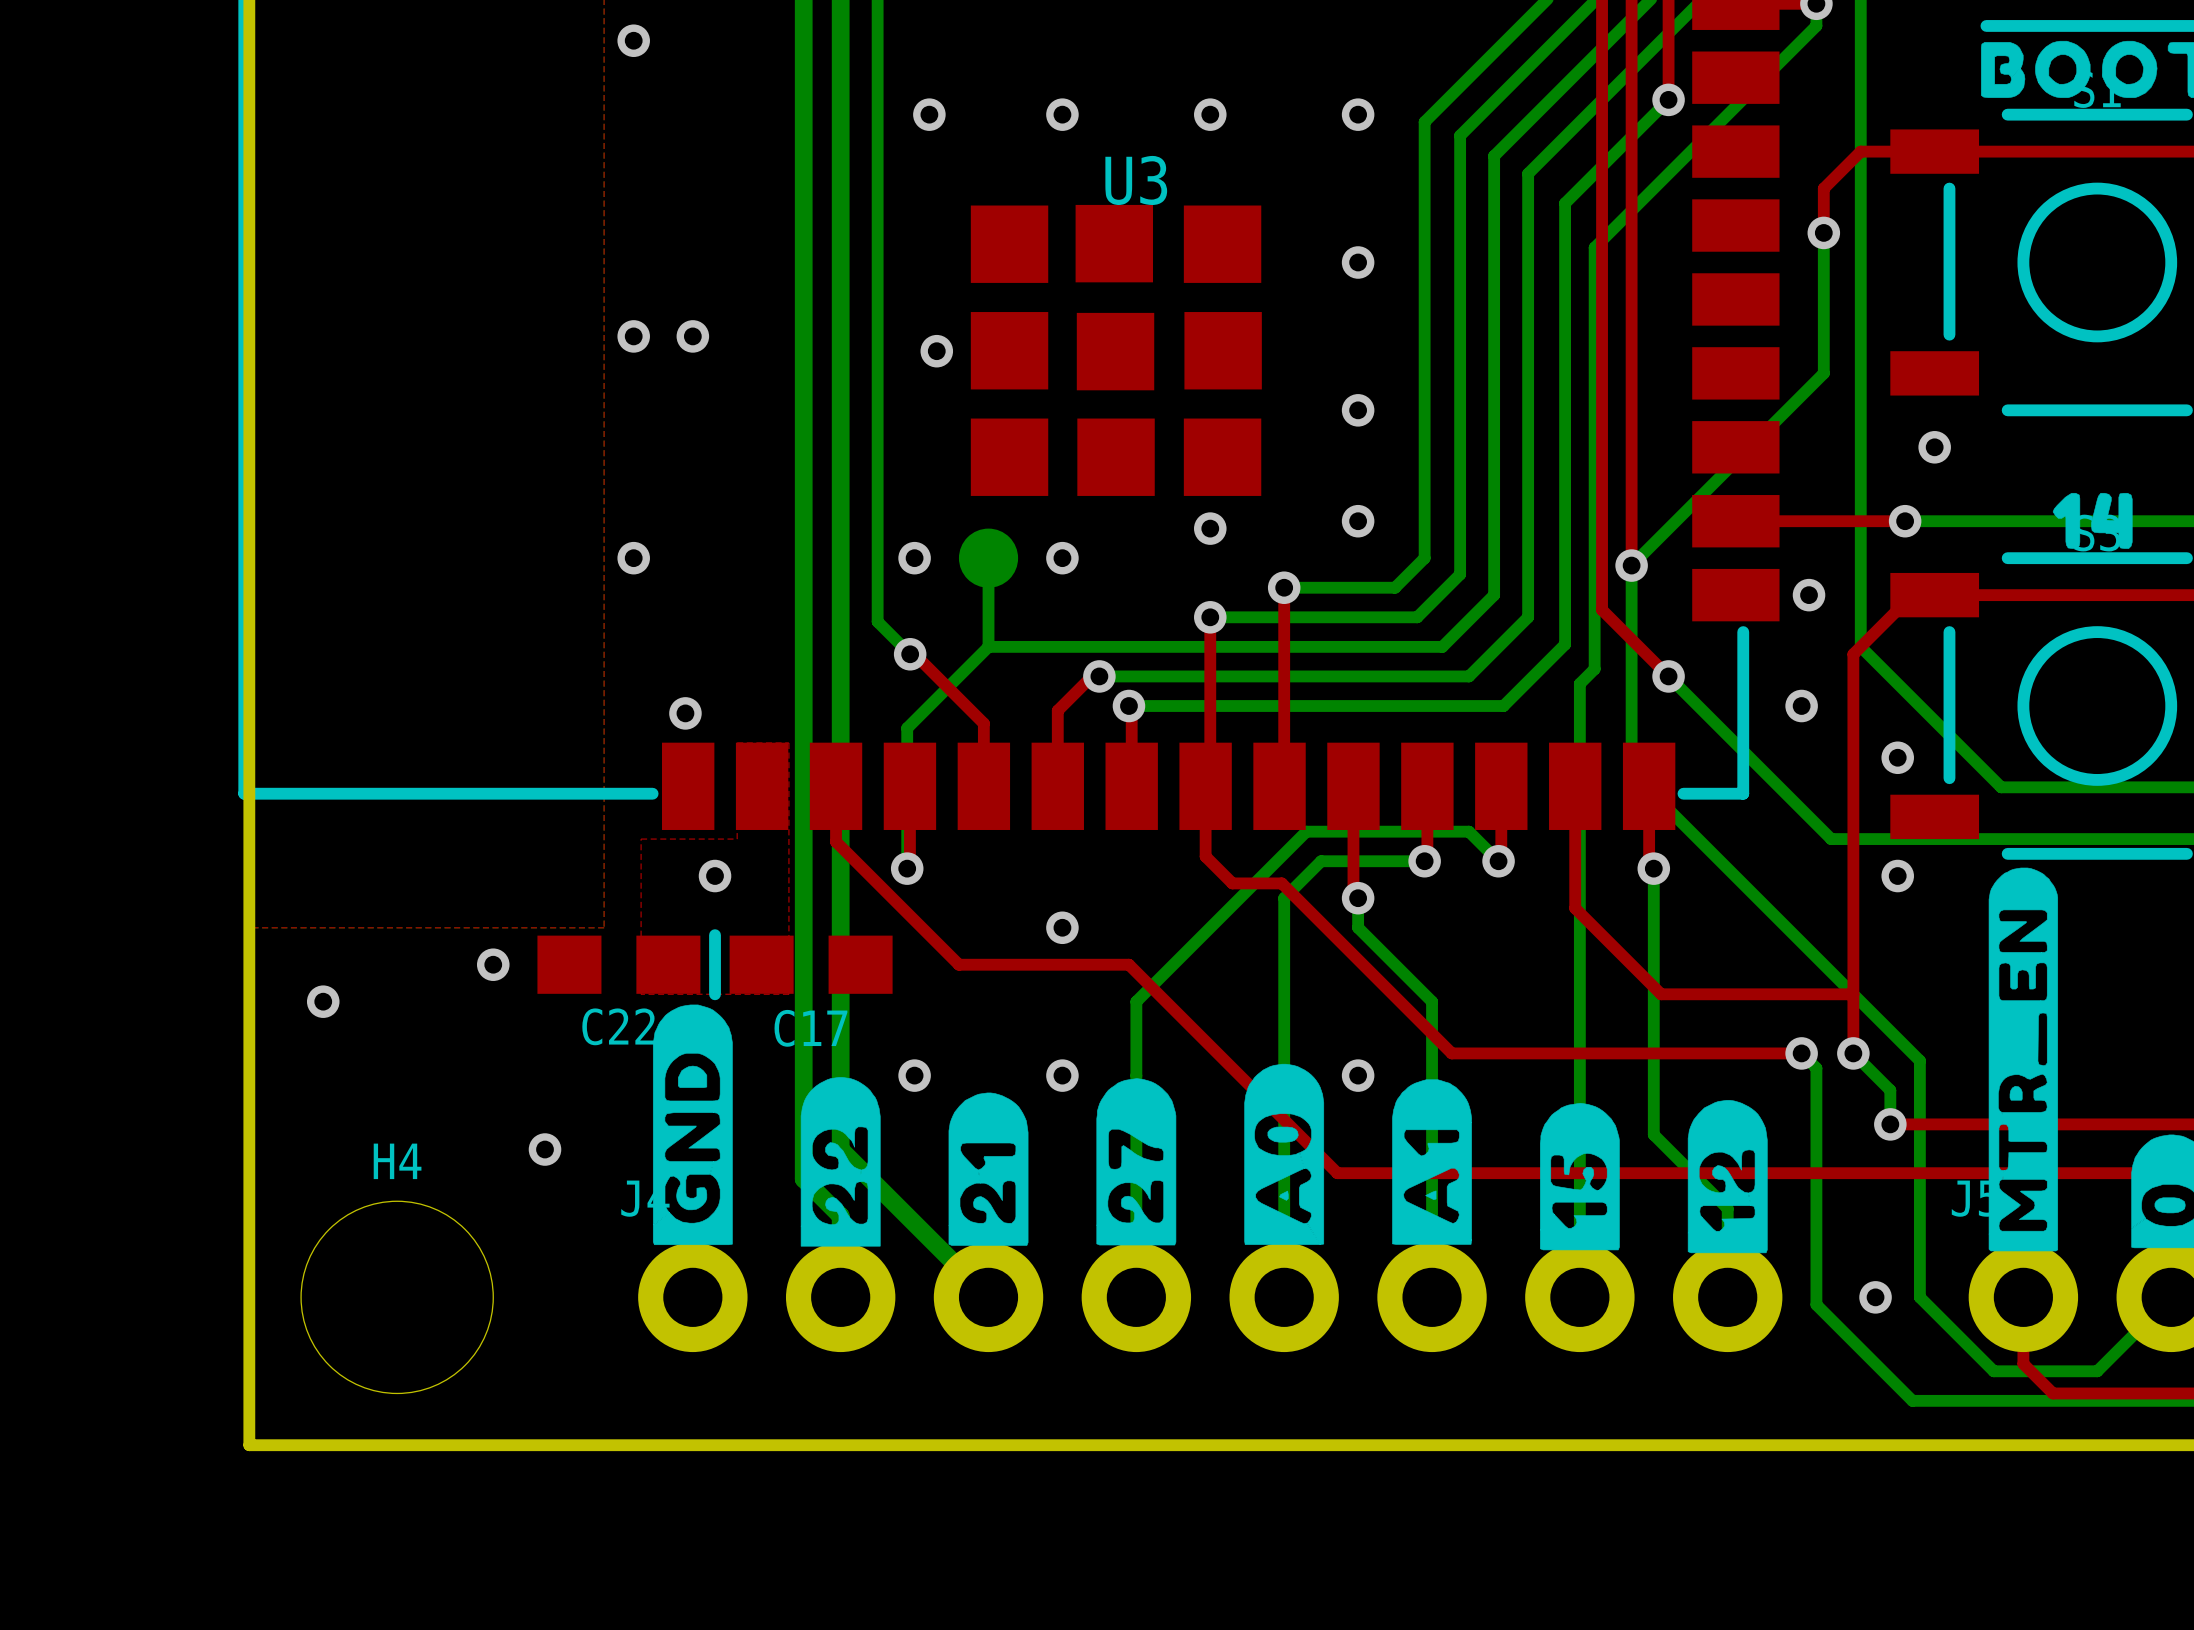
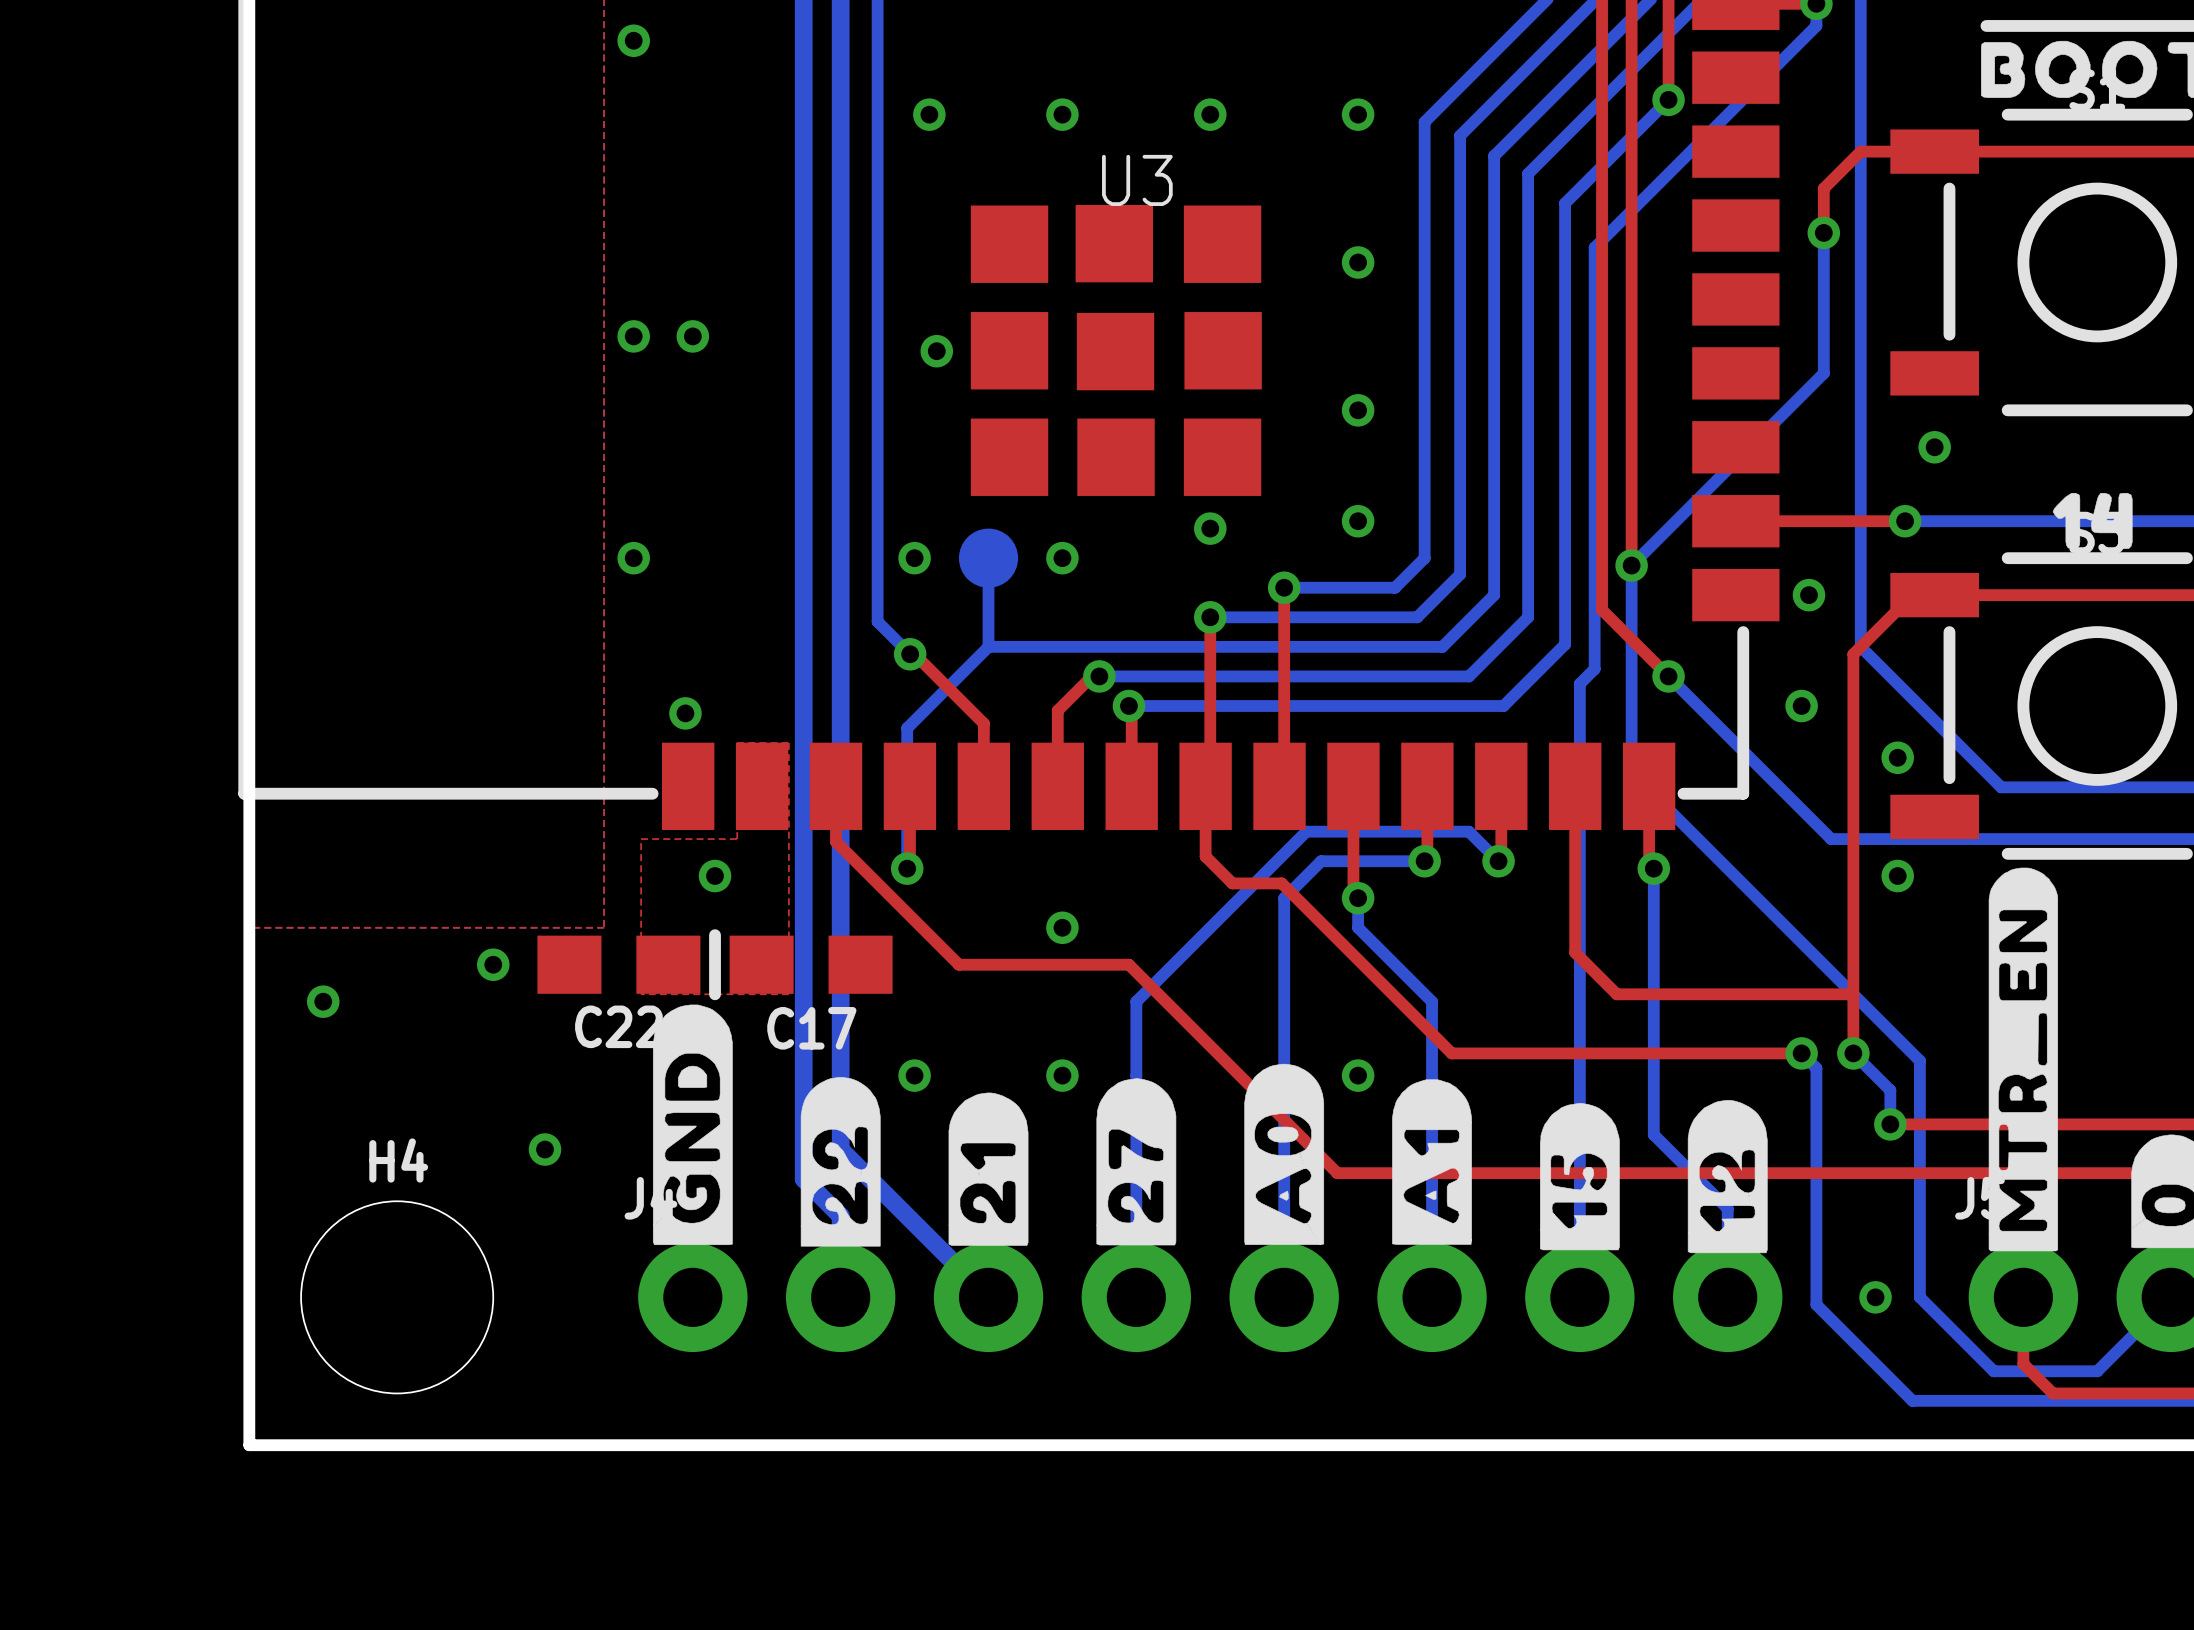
top track: (1575, 908) (1661, 994) -> (1575, 908) (1575, 952) (1616, 994) (1661, 994)

